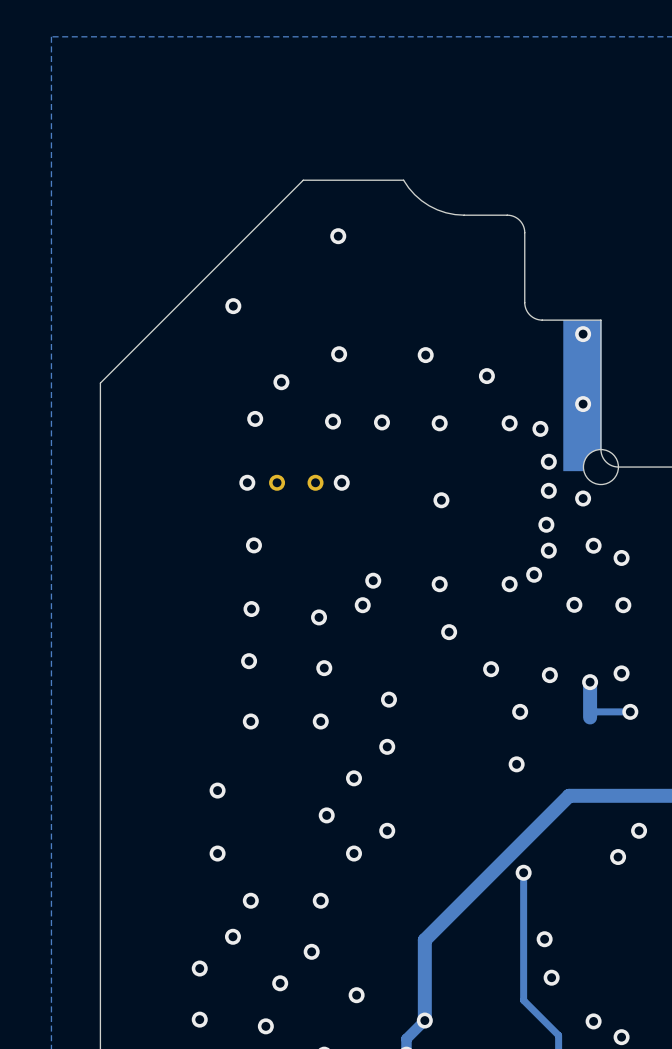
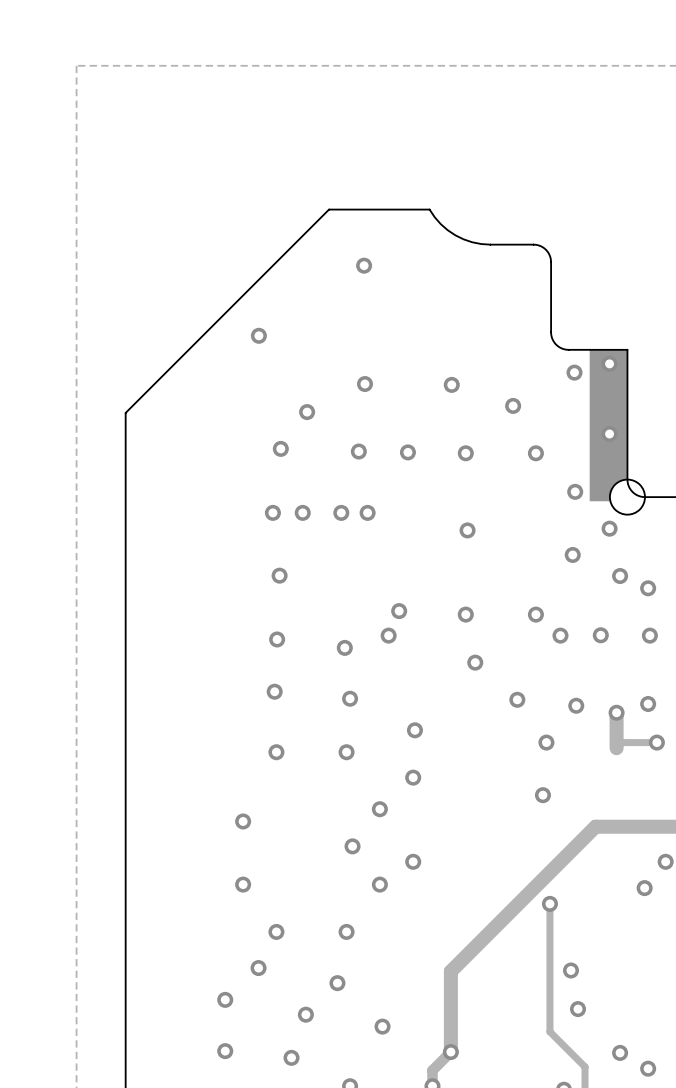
via: none -> (574, 372)
via: (540, 428) -> none
via: (548, 490) -> none
via: (548, 550) -> none
via: (534, 574) -> none
via: none -> (560, 635)

